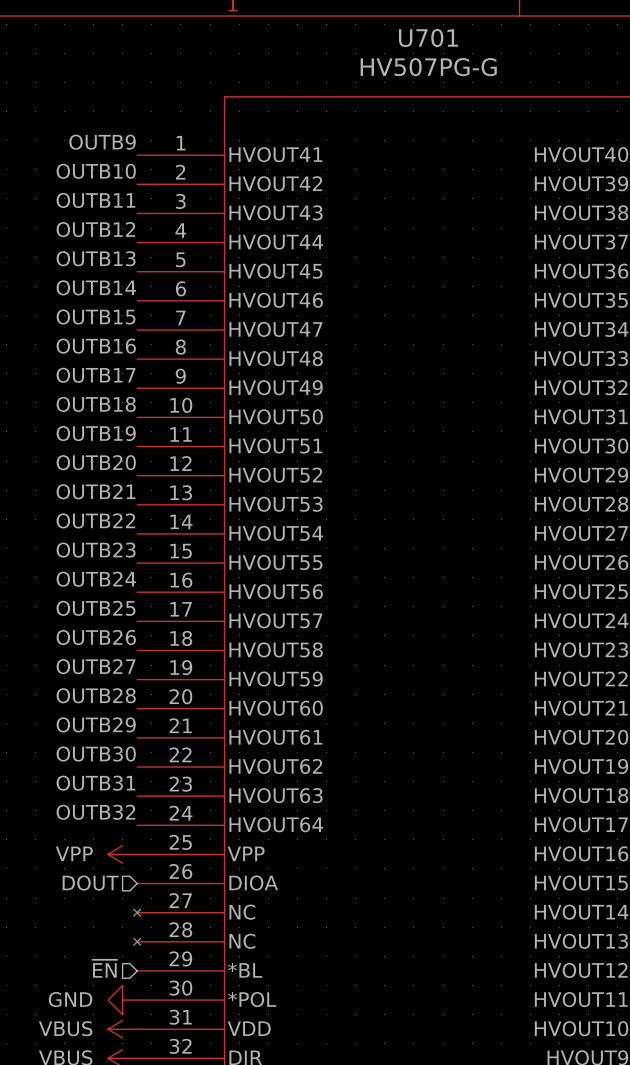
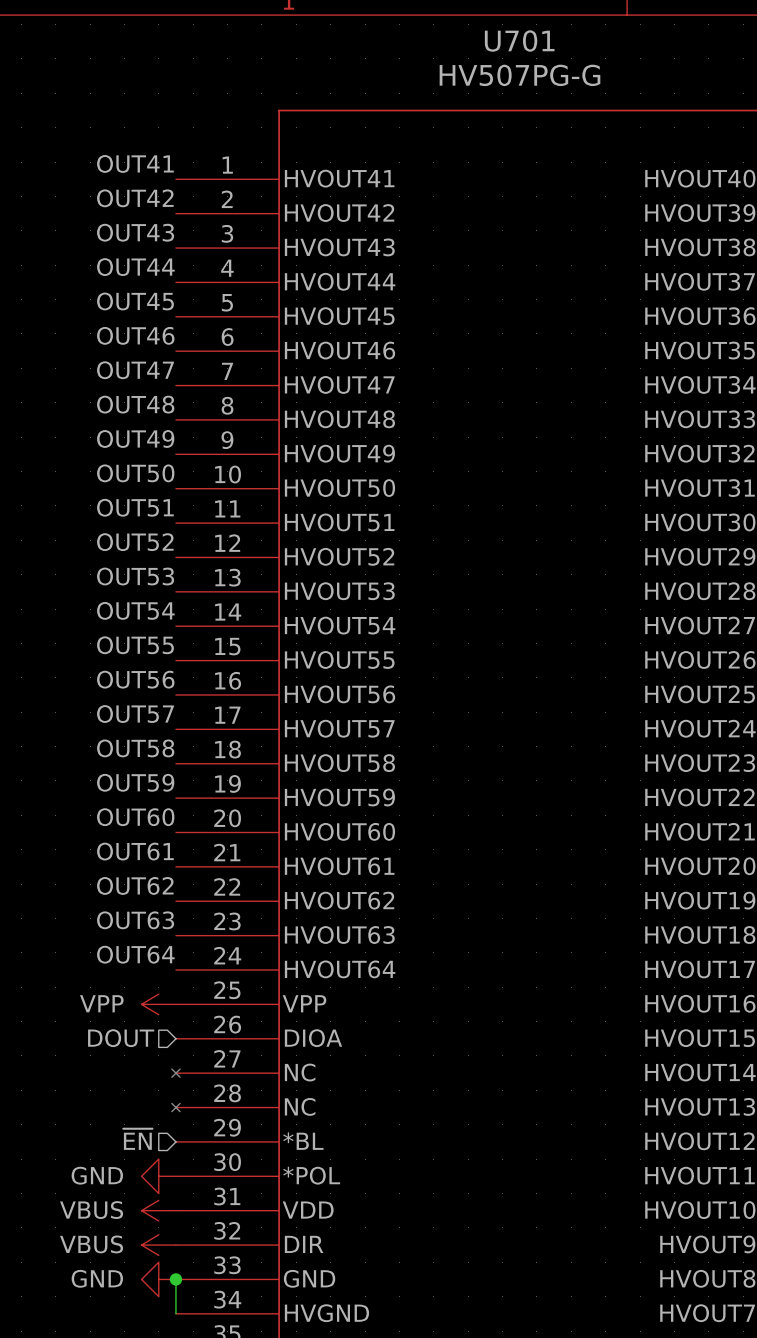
label: OUTB9 (102, 142) -> OUT41 (135, 163)
label: OUTB10 (96, 171) -> OUT42 (135, 198)
label: OUTB11 (95, 200) -> OUT43 (135, 232)
label: OUTB12 (95, 229) -> OUT44 (135, 267)
label: OUTB13 (96, 258) -> OUT45 (135, 301)
label: OUTB14 (96, 287) -> OUT46 (135, 335)
label: OUTB15 (96, 316) -> OUT47 (135, 370)
label: OUTB16 (96, 346) -> OUT48 (135, 404)
label: OUTB17 (96, 375) -> OUT49 (135, 438)
label: OUTB18 (96, 404) -> OUT50 (135, 473)
label: OUTB19 (96, 433) -> OUT51 (135, 507)
label: OUTB20 (96, 462) -> OUT52 (135, 542)
label: OUTB21 (95, 491) -> OUT53 (135, 576)
label: OUTB22 (95, 520) -> OUT54 (135, 610)
label: OUTB23 (96, 550) -> OUT55 (135, 645)
label: OUTB24 (96, 579) -> OUT56 (135, 679)
label: OUTB25 (96, 608) -> OUT57 (135, 714)
label: OUTB26 (96, 637) -> OUT58 (135, 748)
label: OUTB27 (96, 666) -> OUT59 (135, 782)
label: OUTB28 (96, 695) -> OUT60 (135, 817)
label: OUTB29 (96, 724) -> OUT61 (135, 851)
label: OUTB30 (96, 754) -> OUT62 (135, 885)
label: OUTB31 (95, 783) -> OUT63 (135, 920)
label: OUTB32 (95, 812) -> OUT64 (135, 954)

